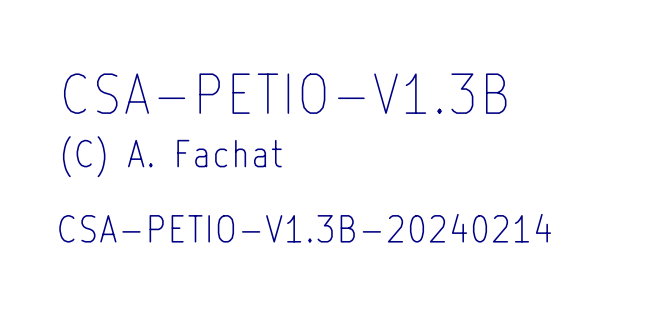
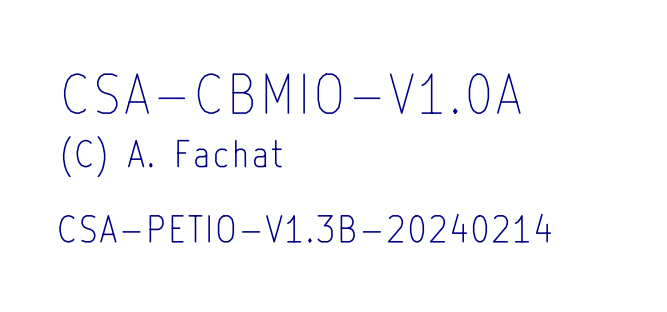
text: CSA-PETIO-V1.3B (285, 93) -> CSA-CBMIO-V1.0A (292, 93)

